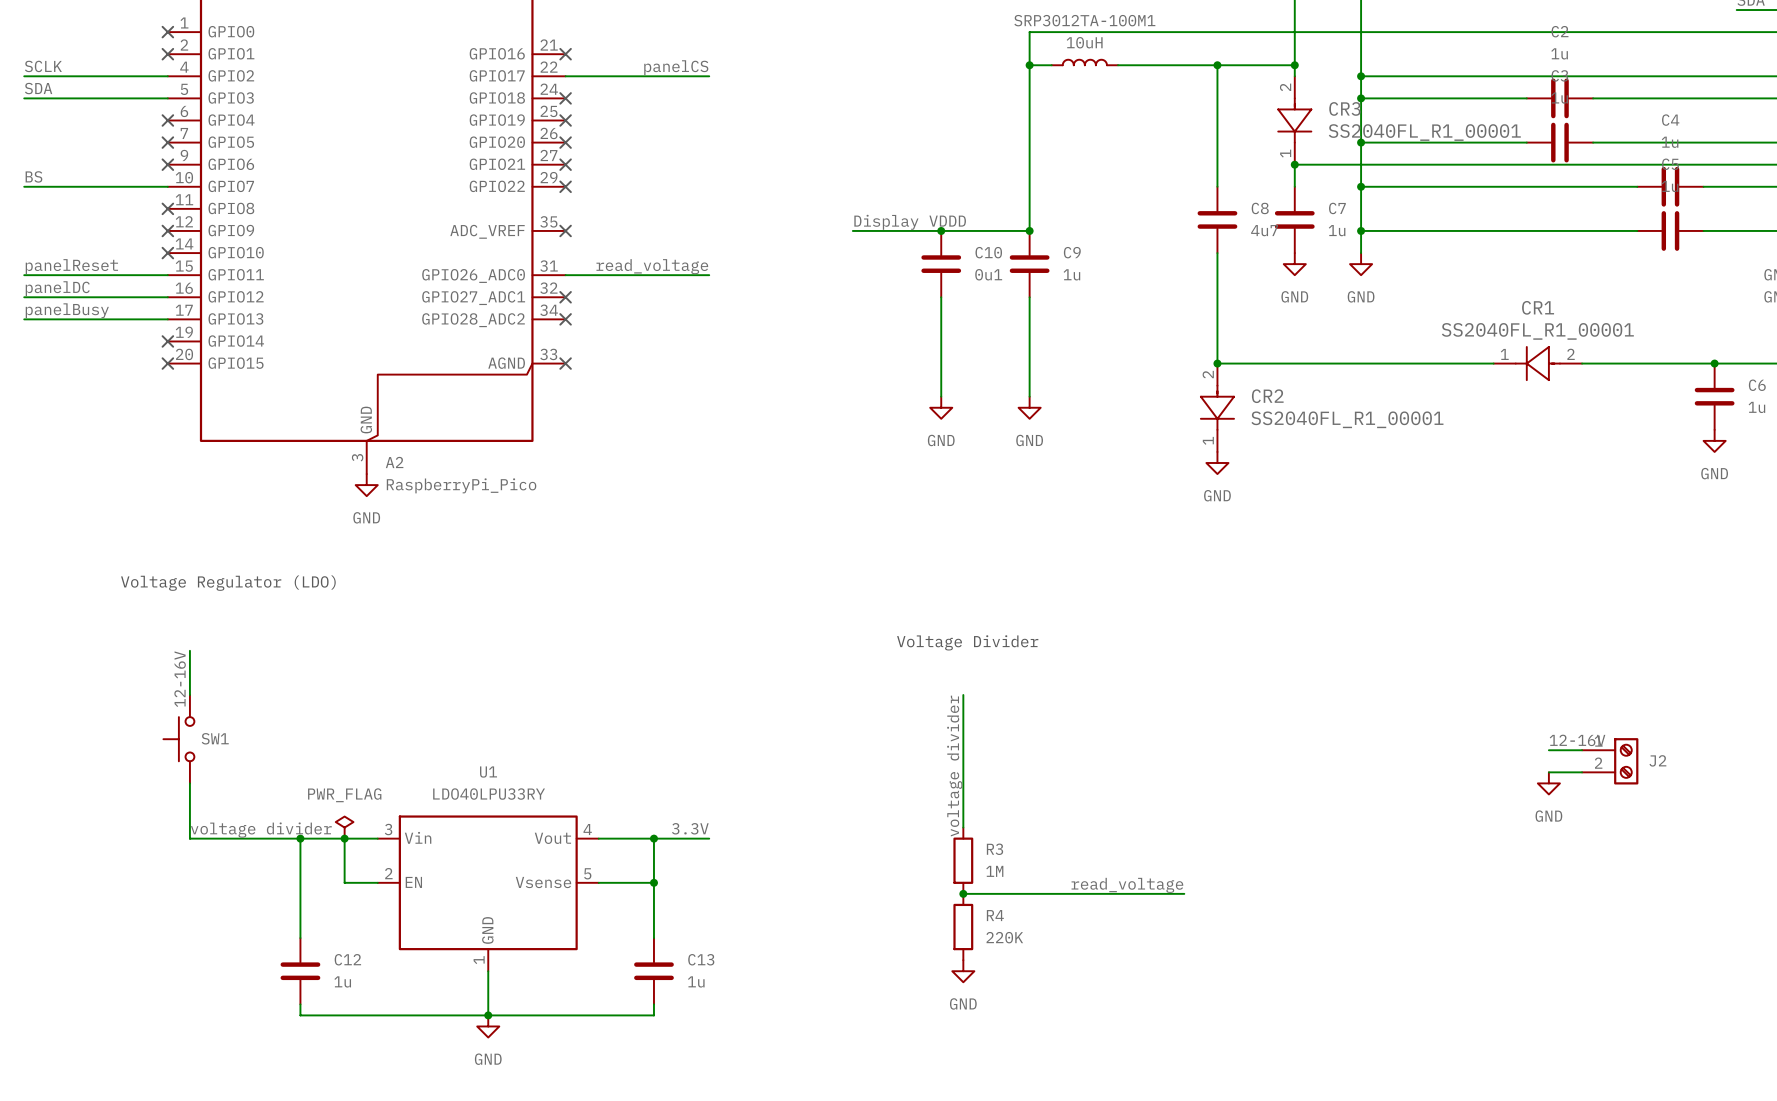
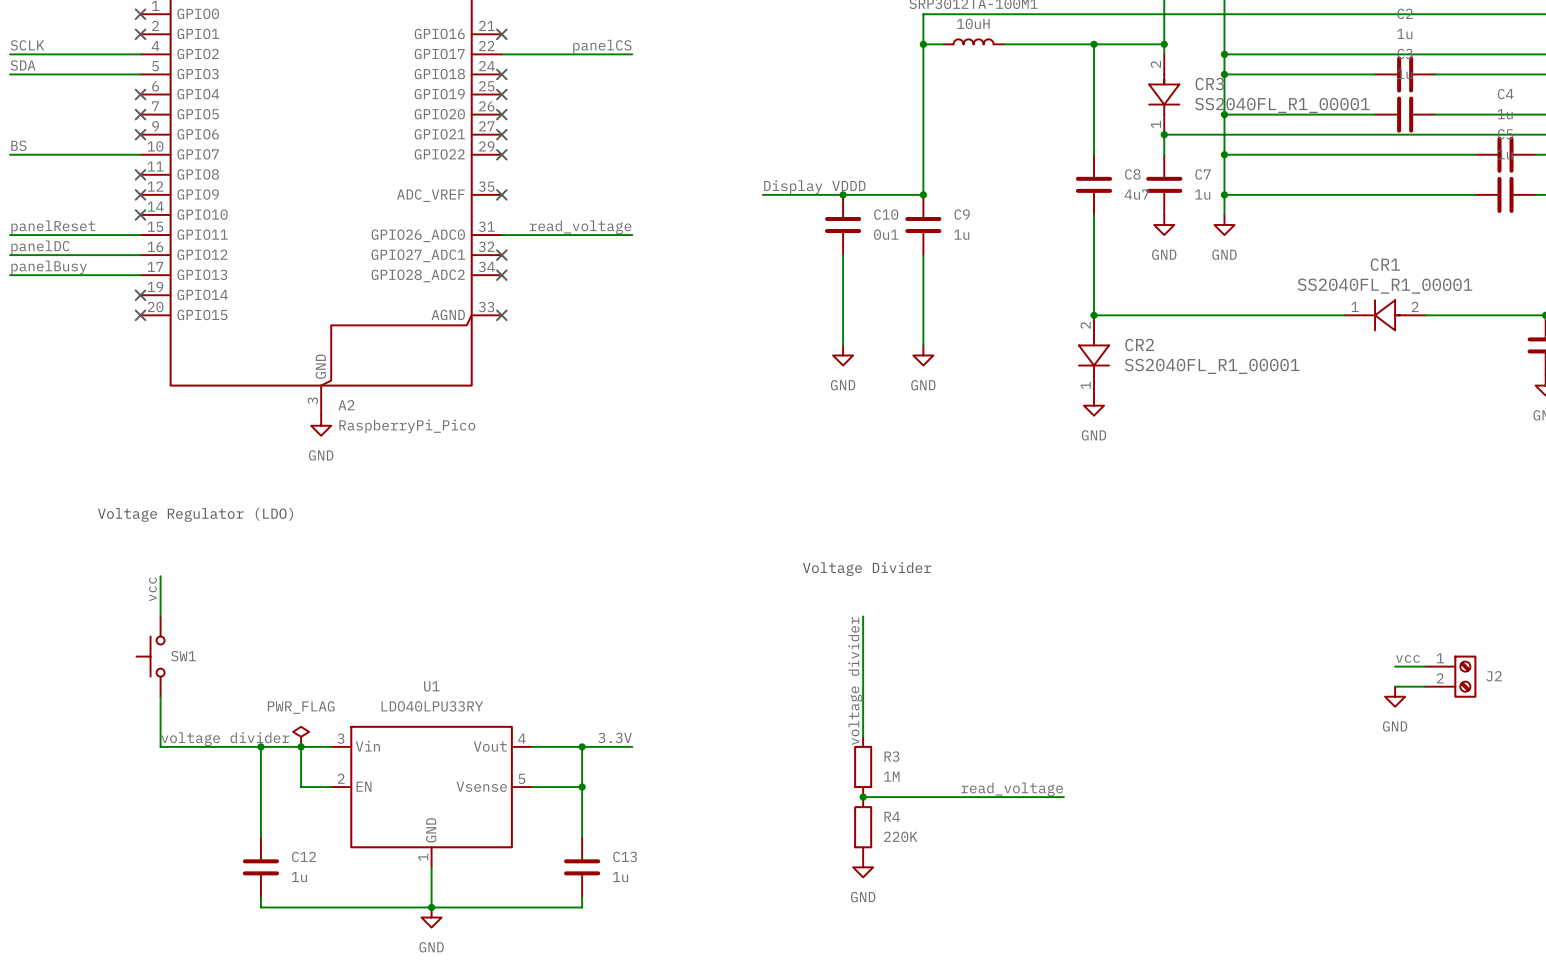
label: 12-16V (180, 679) -> vcc (152, 589)
label: 12-16V (1577, 740) -> vcc (1407, 658)

